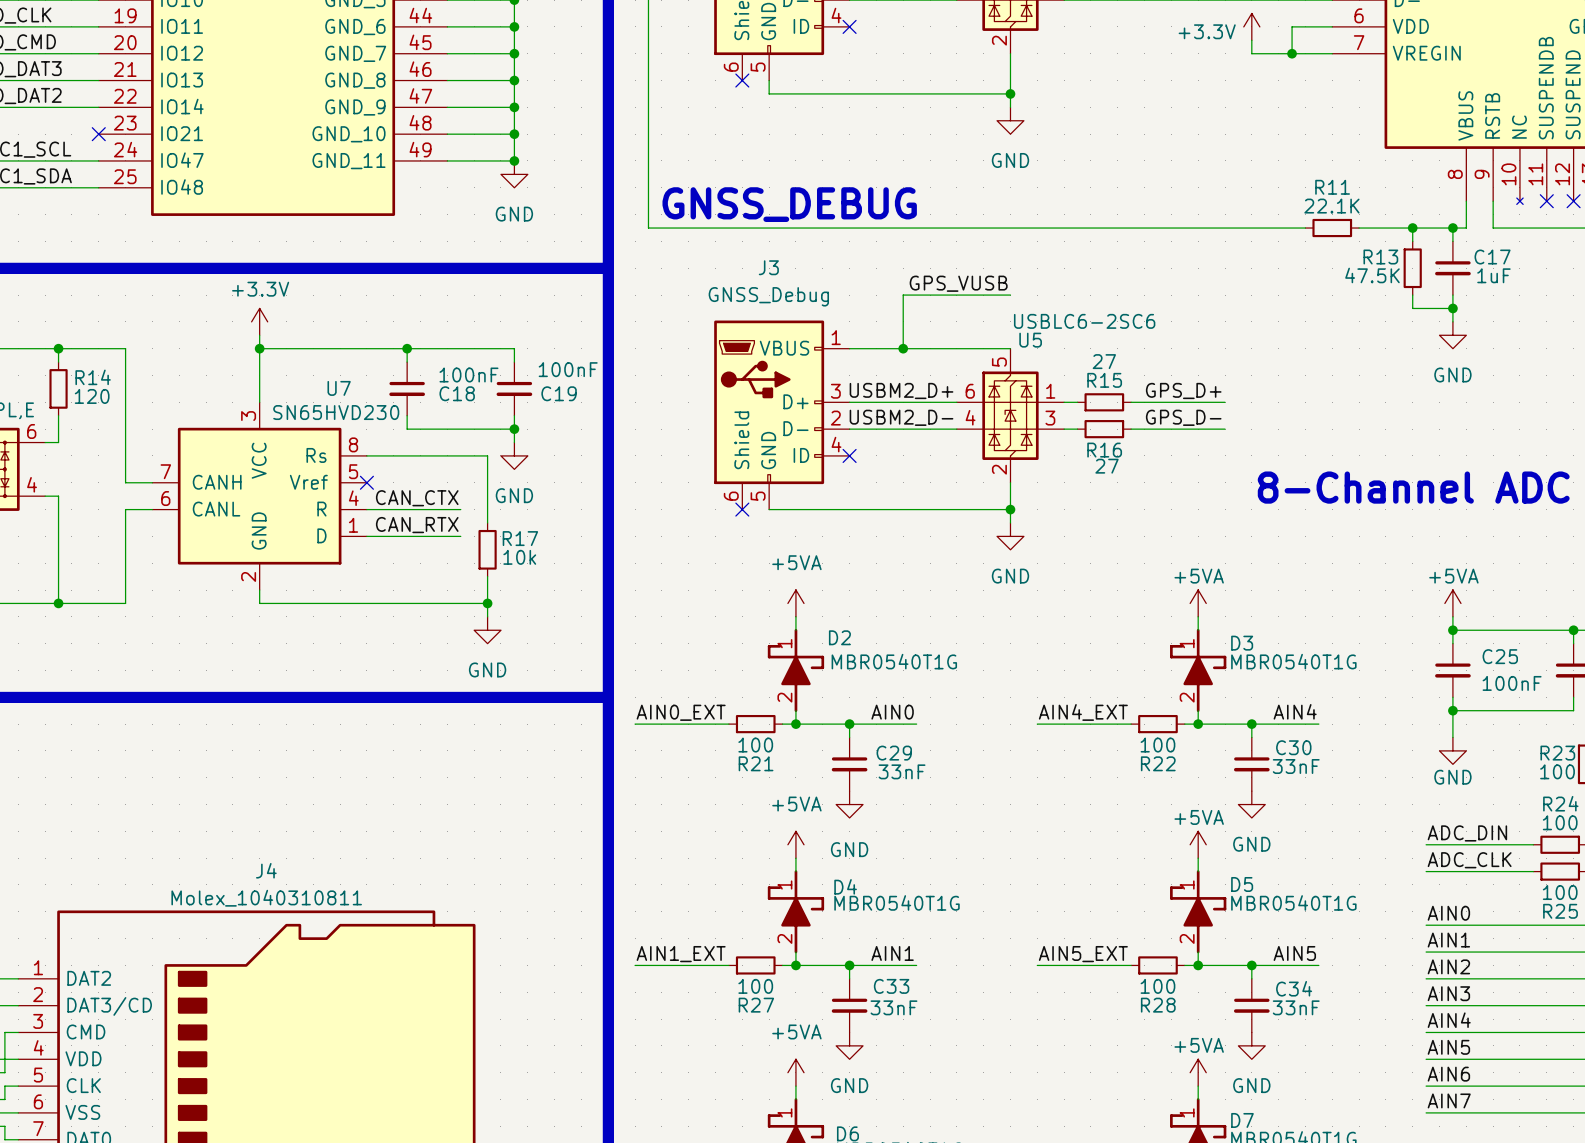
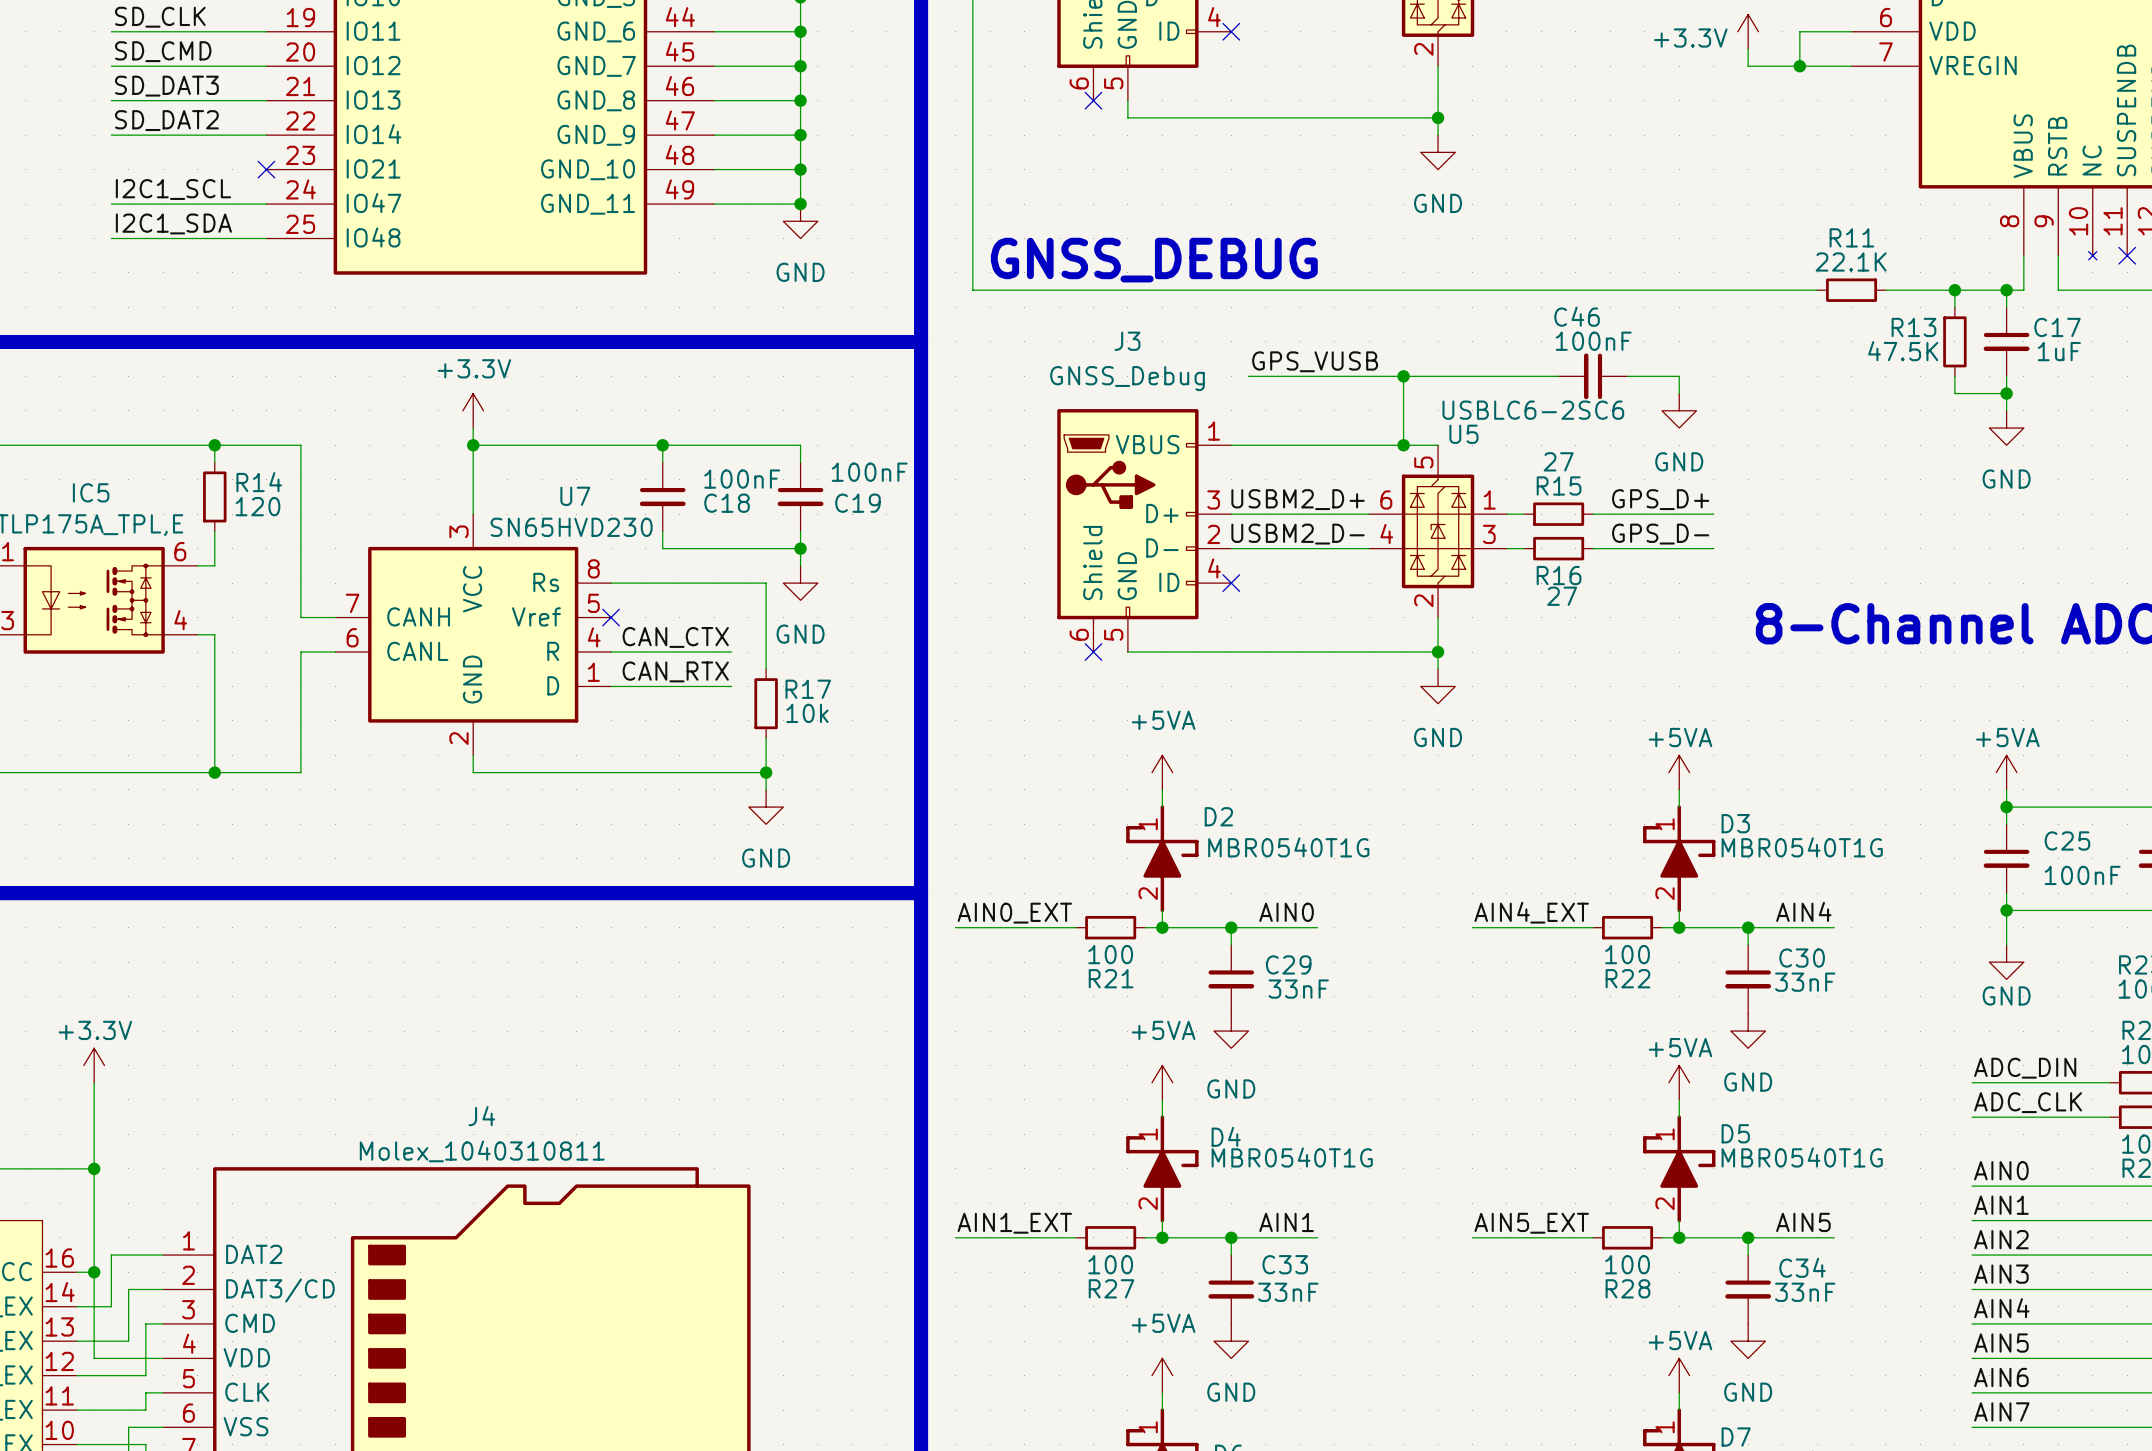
label position: GPS_VUSB (958, 283) -> GPS_VUSB (1315, 361)
wire: (903, 295) (903, 348) -> (1300, 376) (1248, 376)
wire: none -> (1403, 376) (1403, 445)
junction: none -> (1403, 376)
wire: none -> (1438, 376) (1558, 376)
C46: none -> 100nF (1593, 376)
wire: none -> (1627, 376) (1679, 376) (1679, 393)
power symbol: none -> GND (1679, 410)
junction: (903, 348) -> none
junction: none -> (1403, 445)

